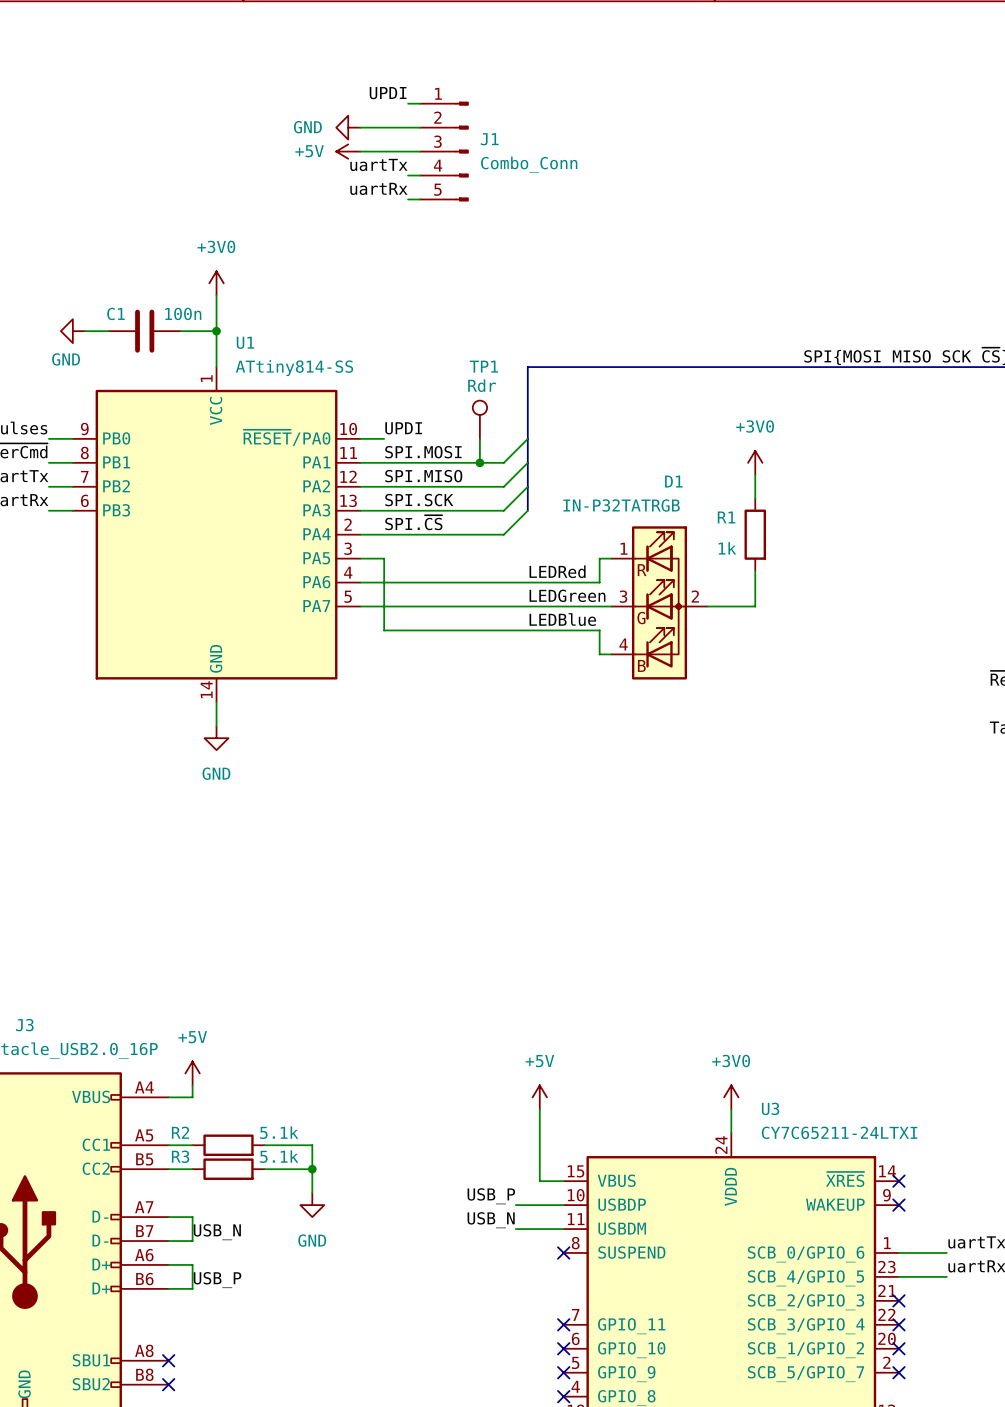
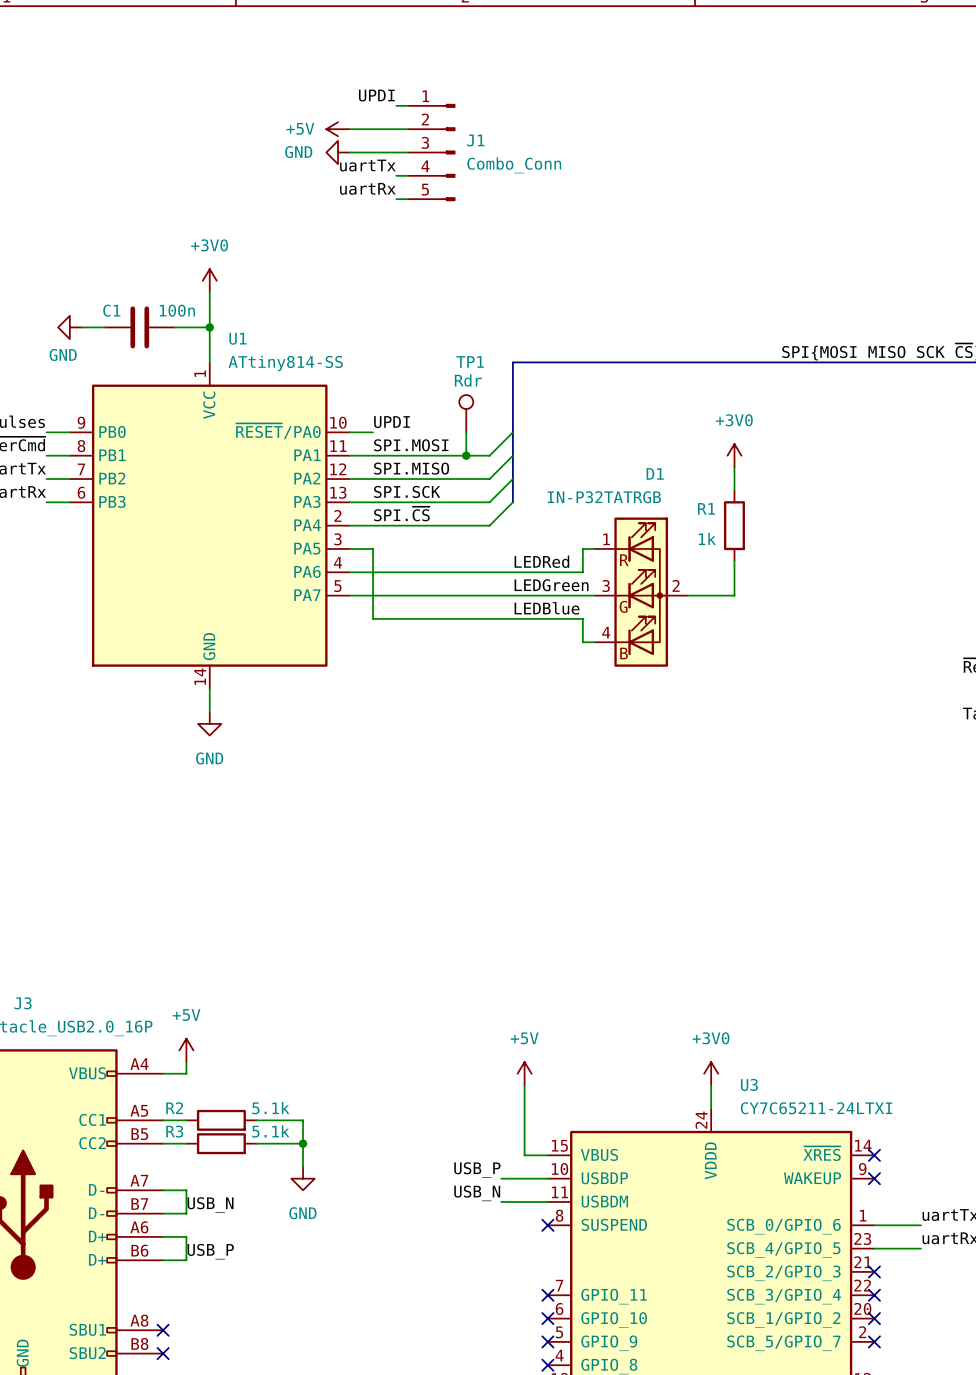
power symbol: GND (348, 127) -> +5V (338, 129)
power symbol: +5V (348, 151) -> GND (338, 152)

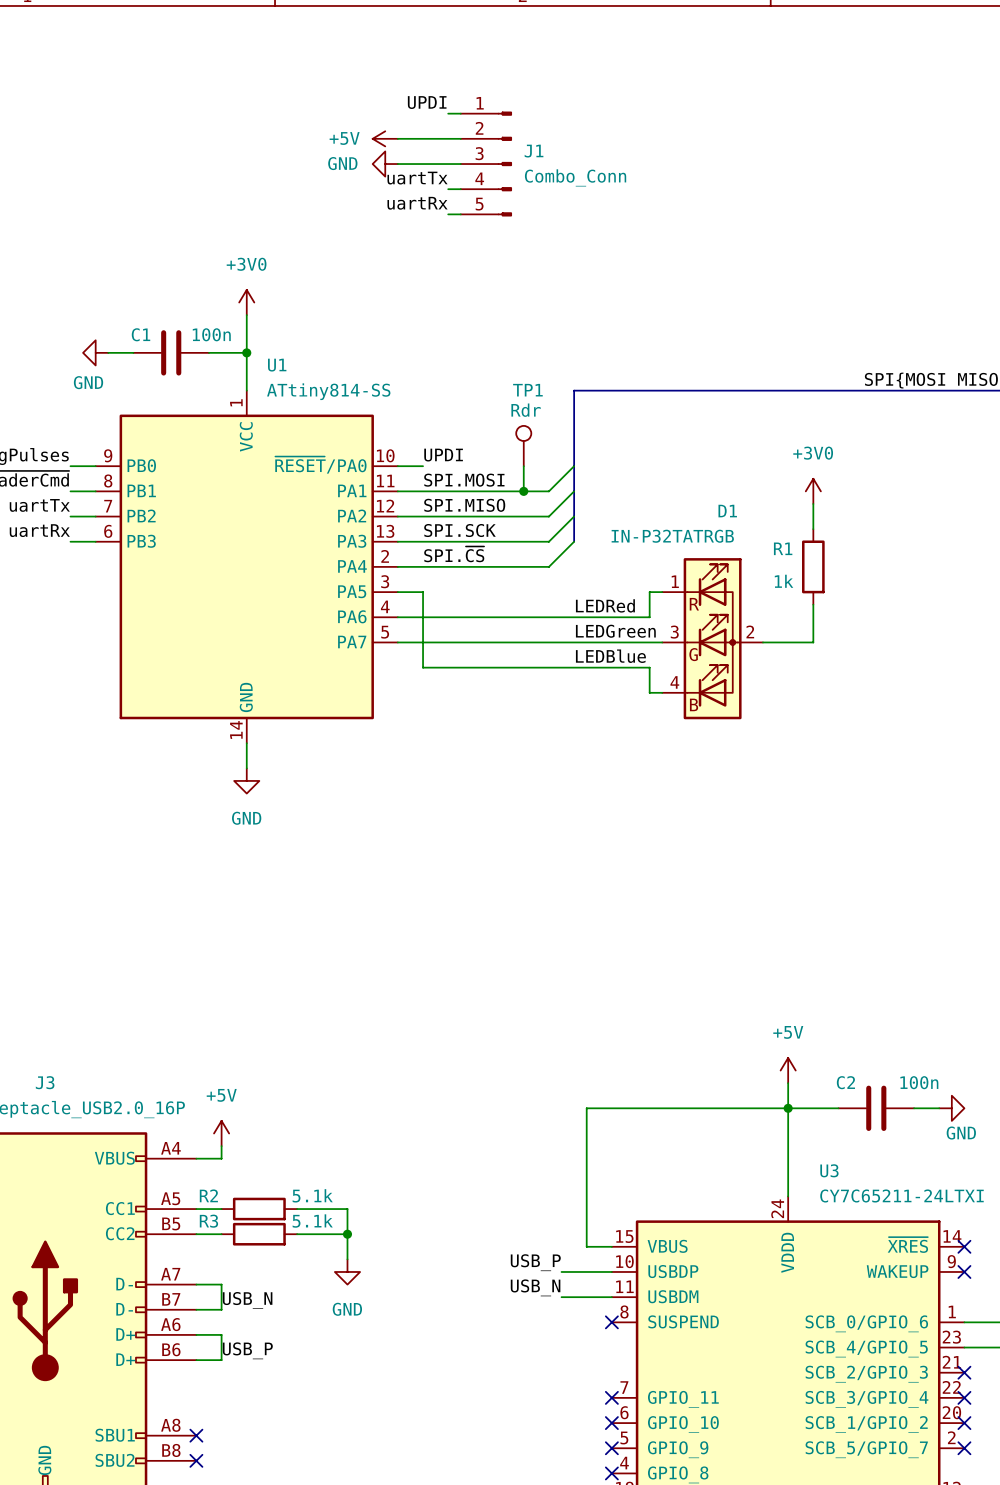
wire: none -> (788, 1083) (788, 1171)
junction: none -> (788, 1108)
wire: none -> (838, 1108) (586, 1108) (586, 1171)
C2: none -> 100n (876, 1108)
wire: none -> (914, 1108) (939, 1108)
power symbol: none -> GND (951, 1108)
power symbol position: +5V (524, 1073) -> +5V (788, 1070)
power symbol: +3V0 (711, 1073) -> none

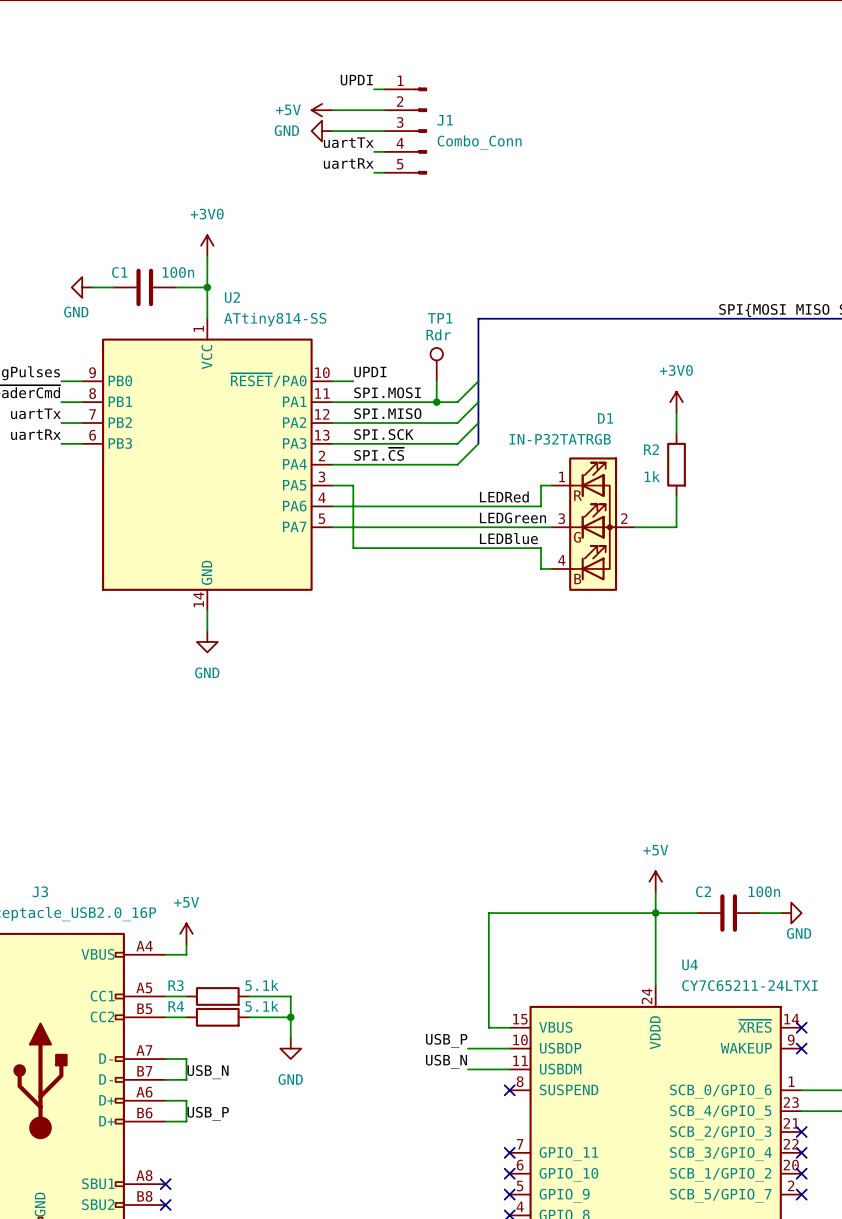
U1 name: U1 (277, 365) -> U2 (232, 297)
R1 name: R1 (783, 548) -> R2 (651, 449)
U3 name: U3 (829, 1170) -> U4 (690, 964)
R2 name: R2 (208, 1195) -> R3 (176, 985)
R3 name: R3 (208, 1221) -> R4 (176, 1006)

